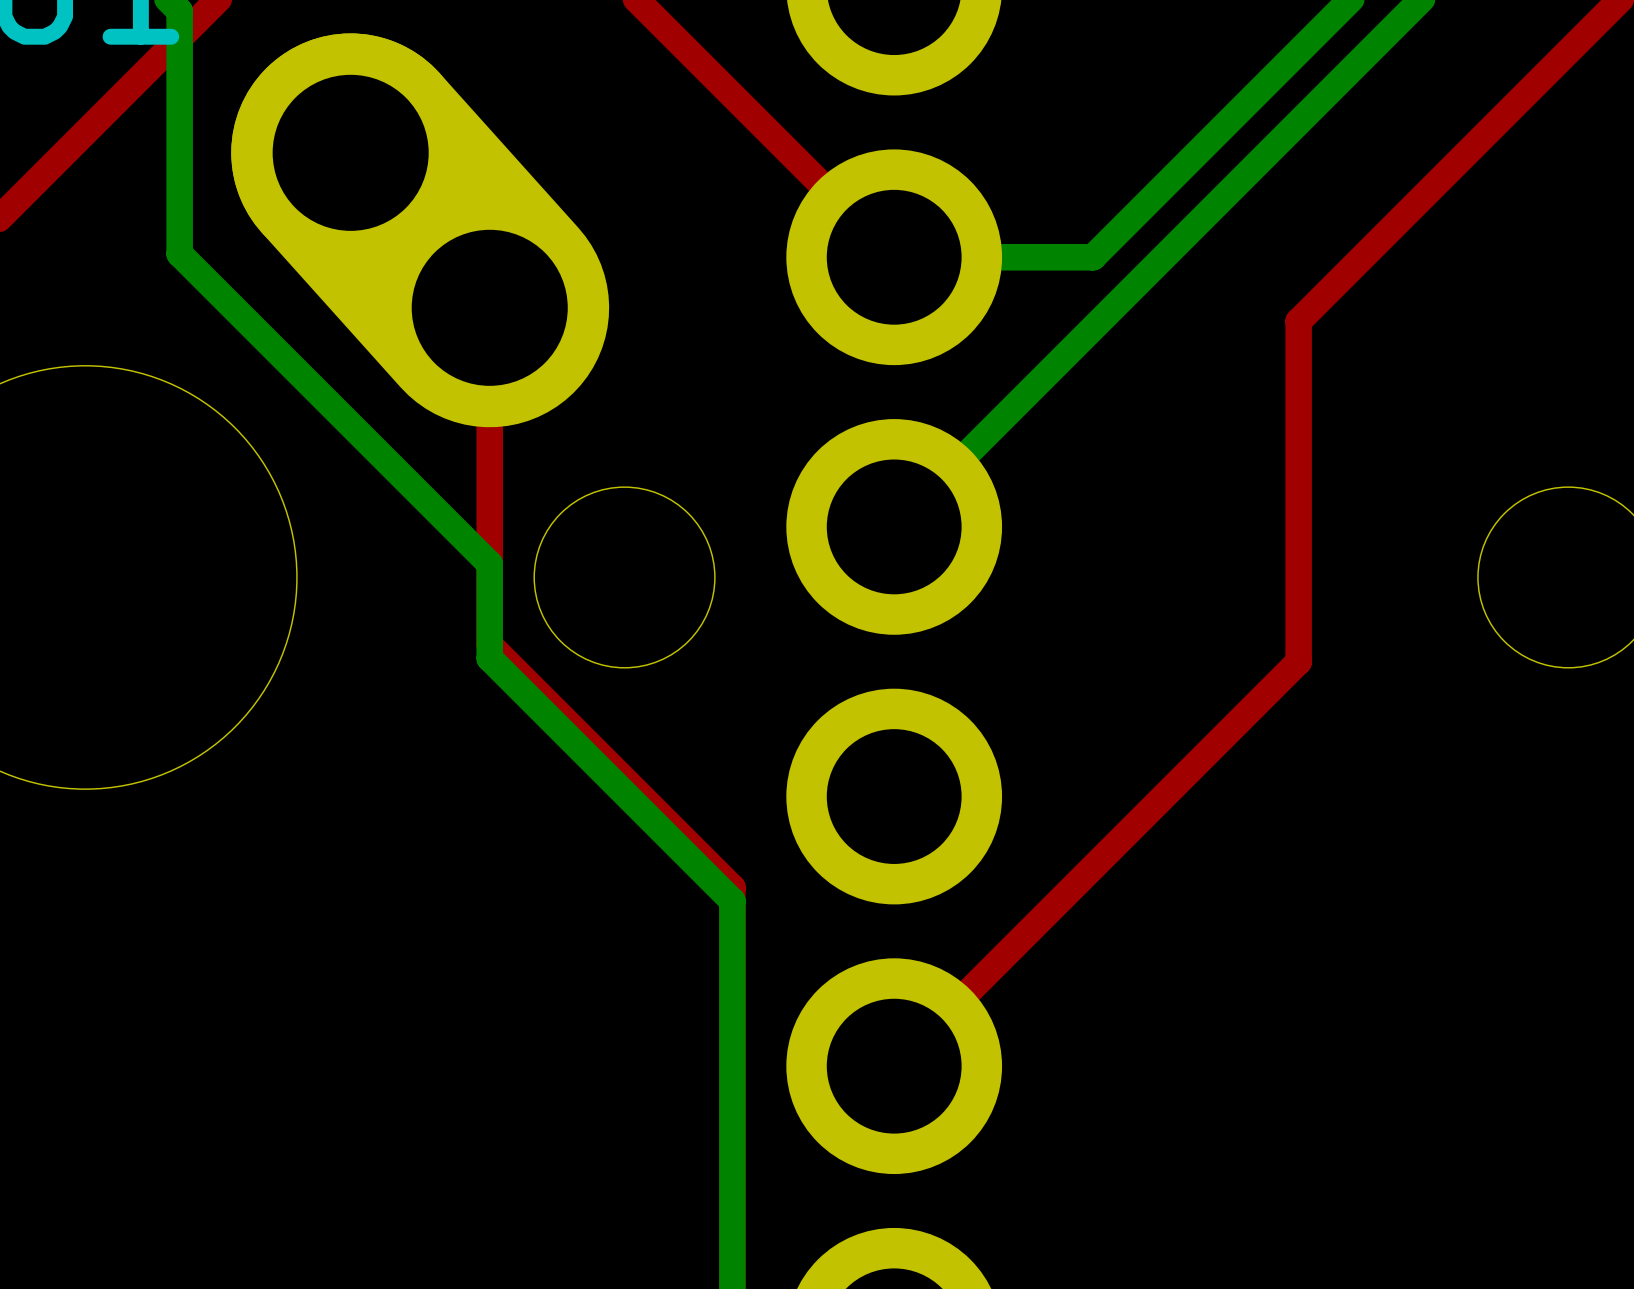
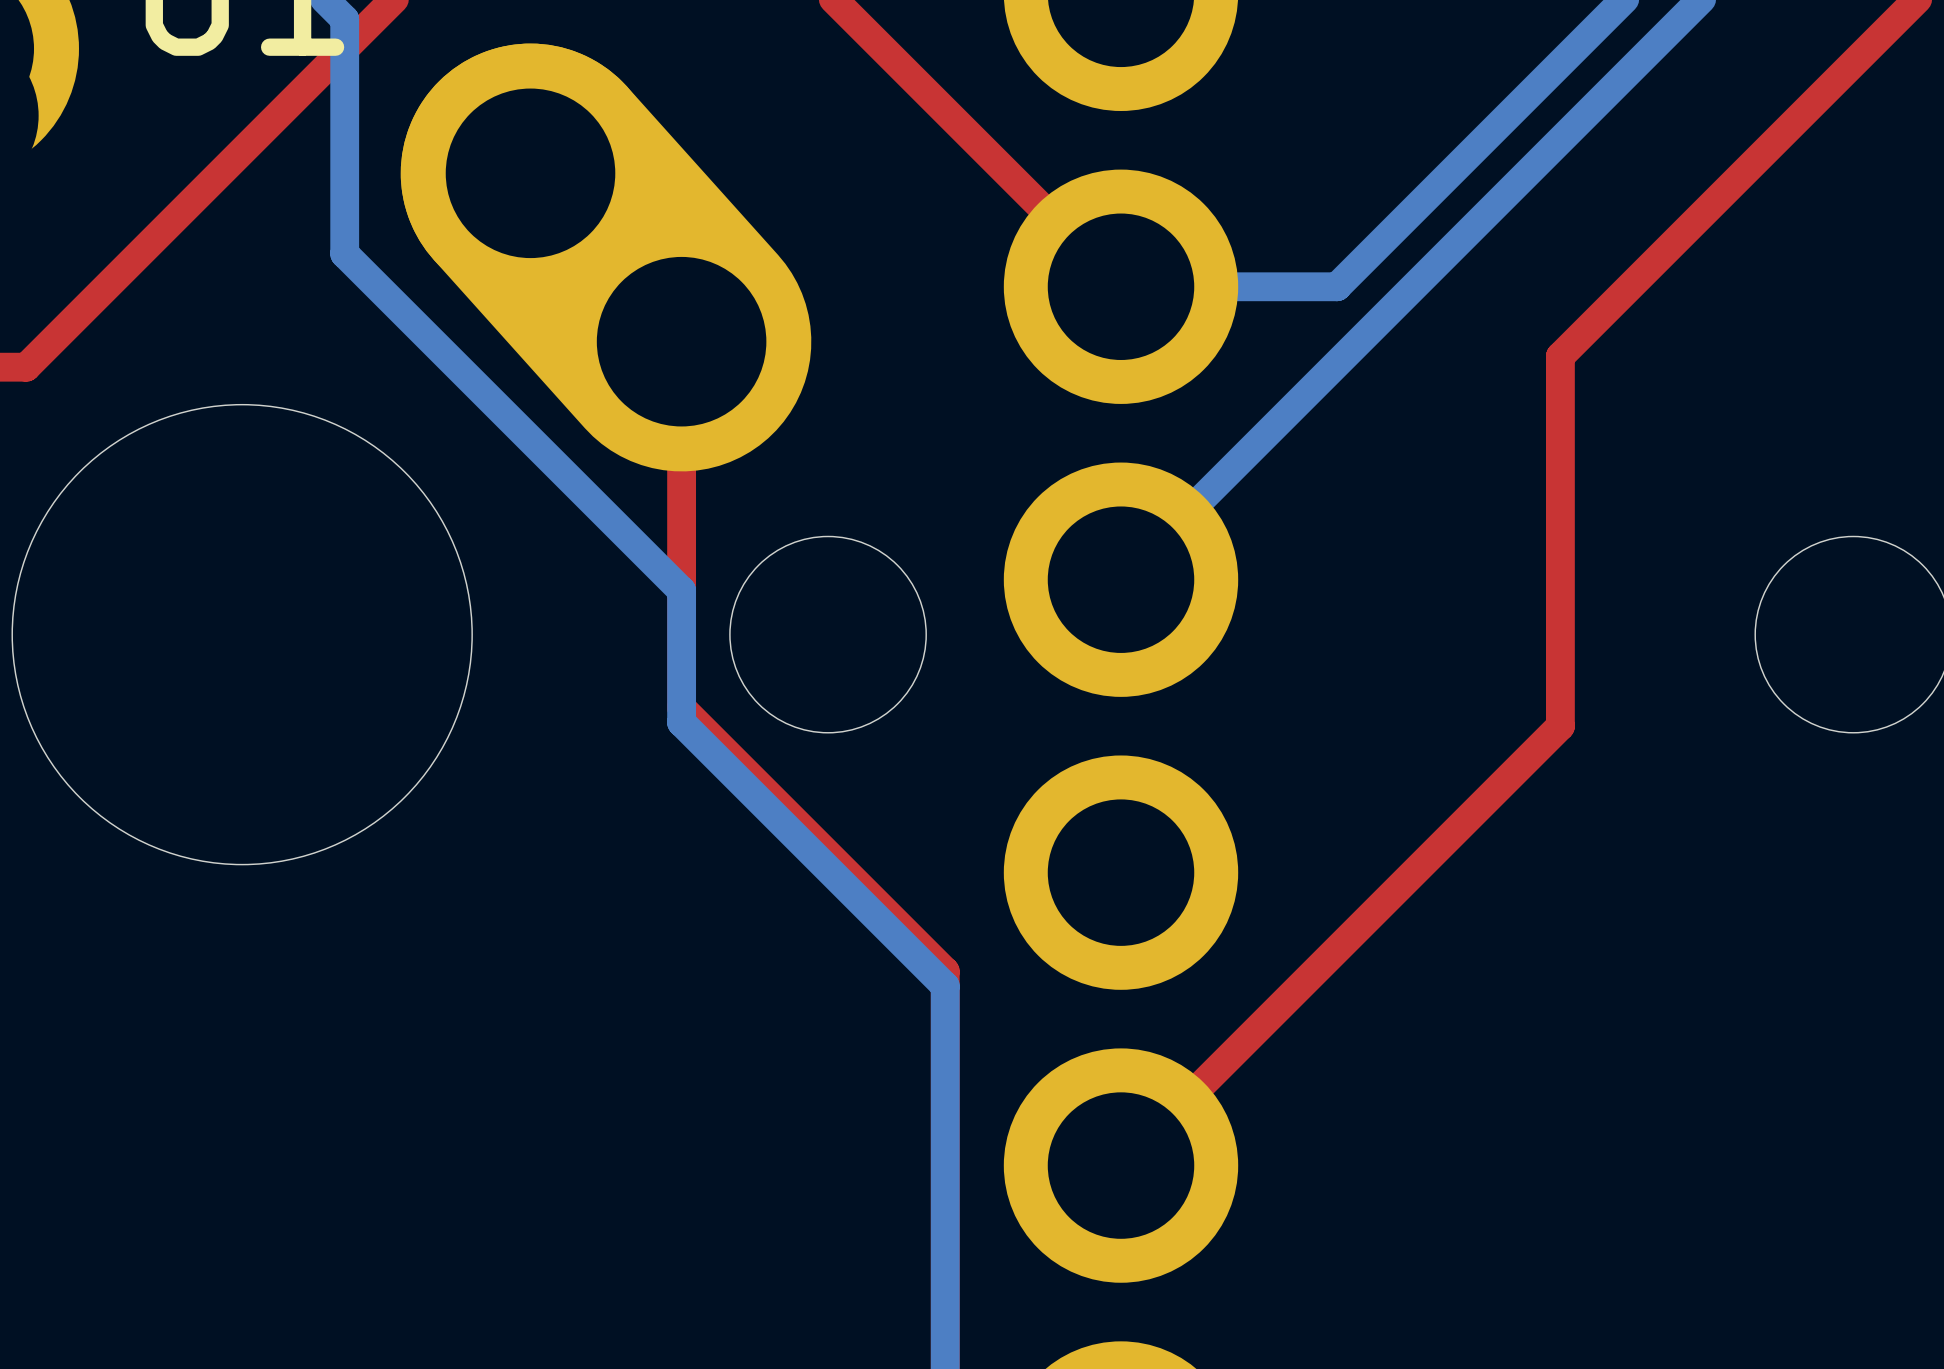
bottom track: (179, 226) (179, 253) (489, 563) -> (344, 253) (681, 590) (681, 619)

